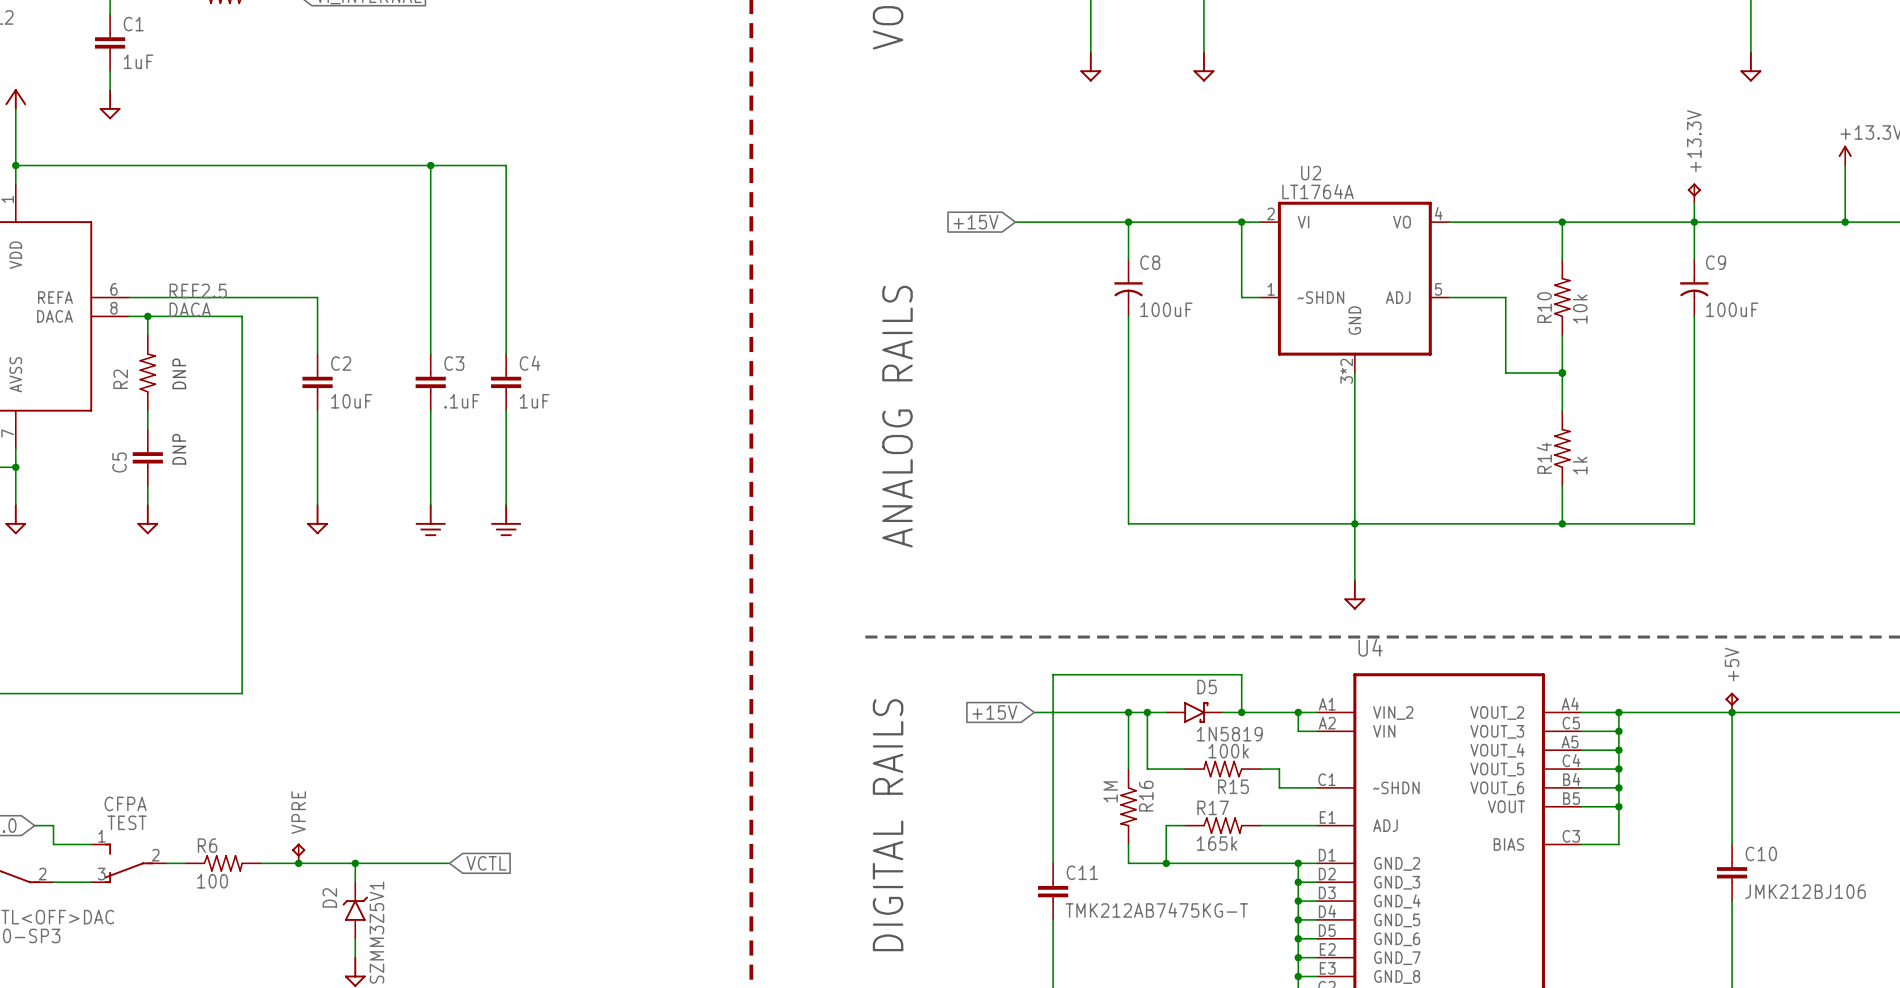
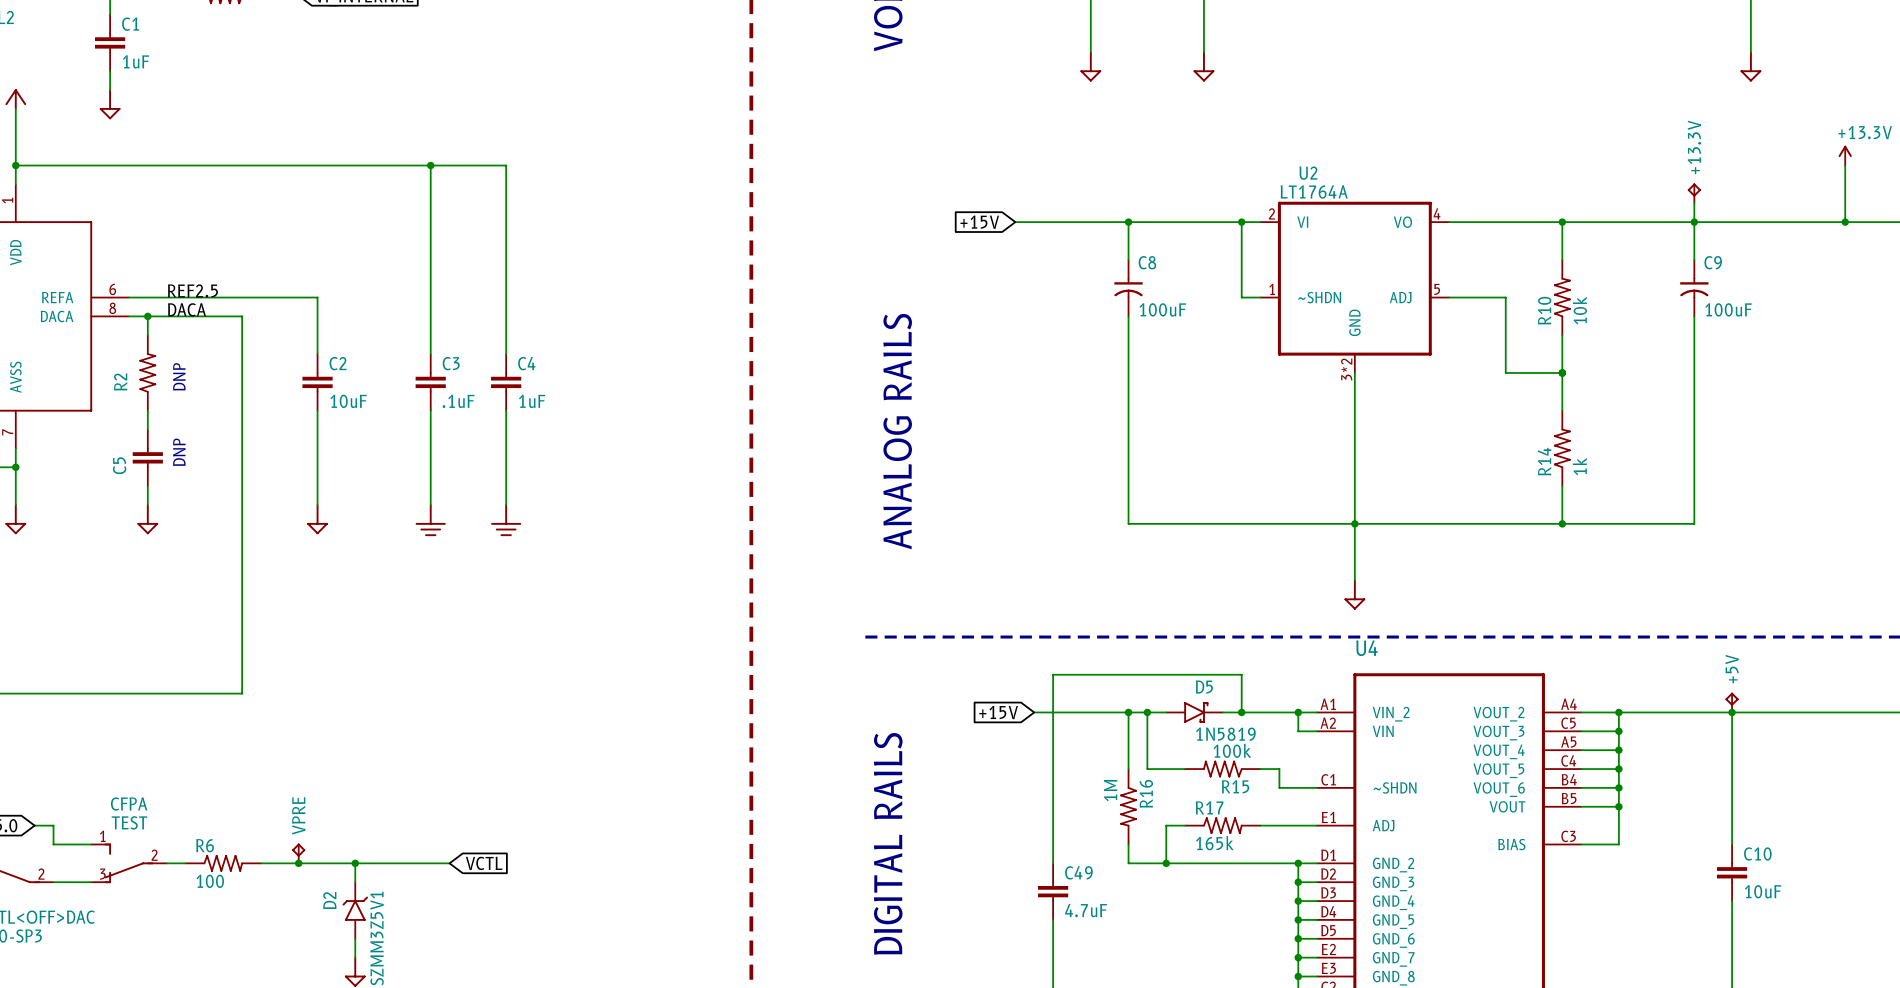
C11 name: C11 (1082, 872) -> C49 (1078, 872)
C10 value: JMK212BJ106 (1805, 891) -> 10uF (1763, 891)
C11 value: TMK212AB7475KG-T (1156, 910) -> 4.7uF (1086, 910)

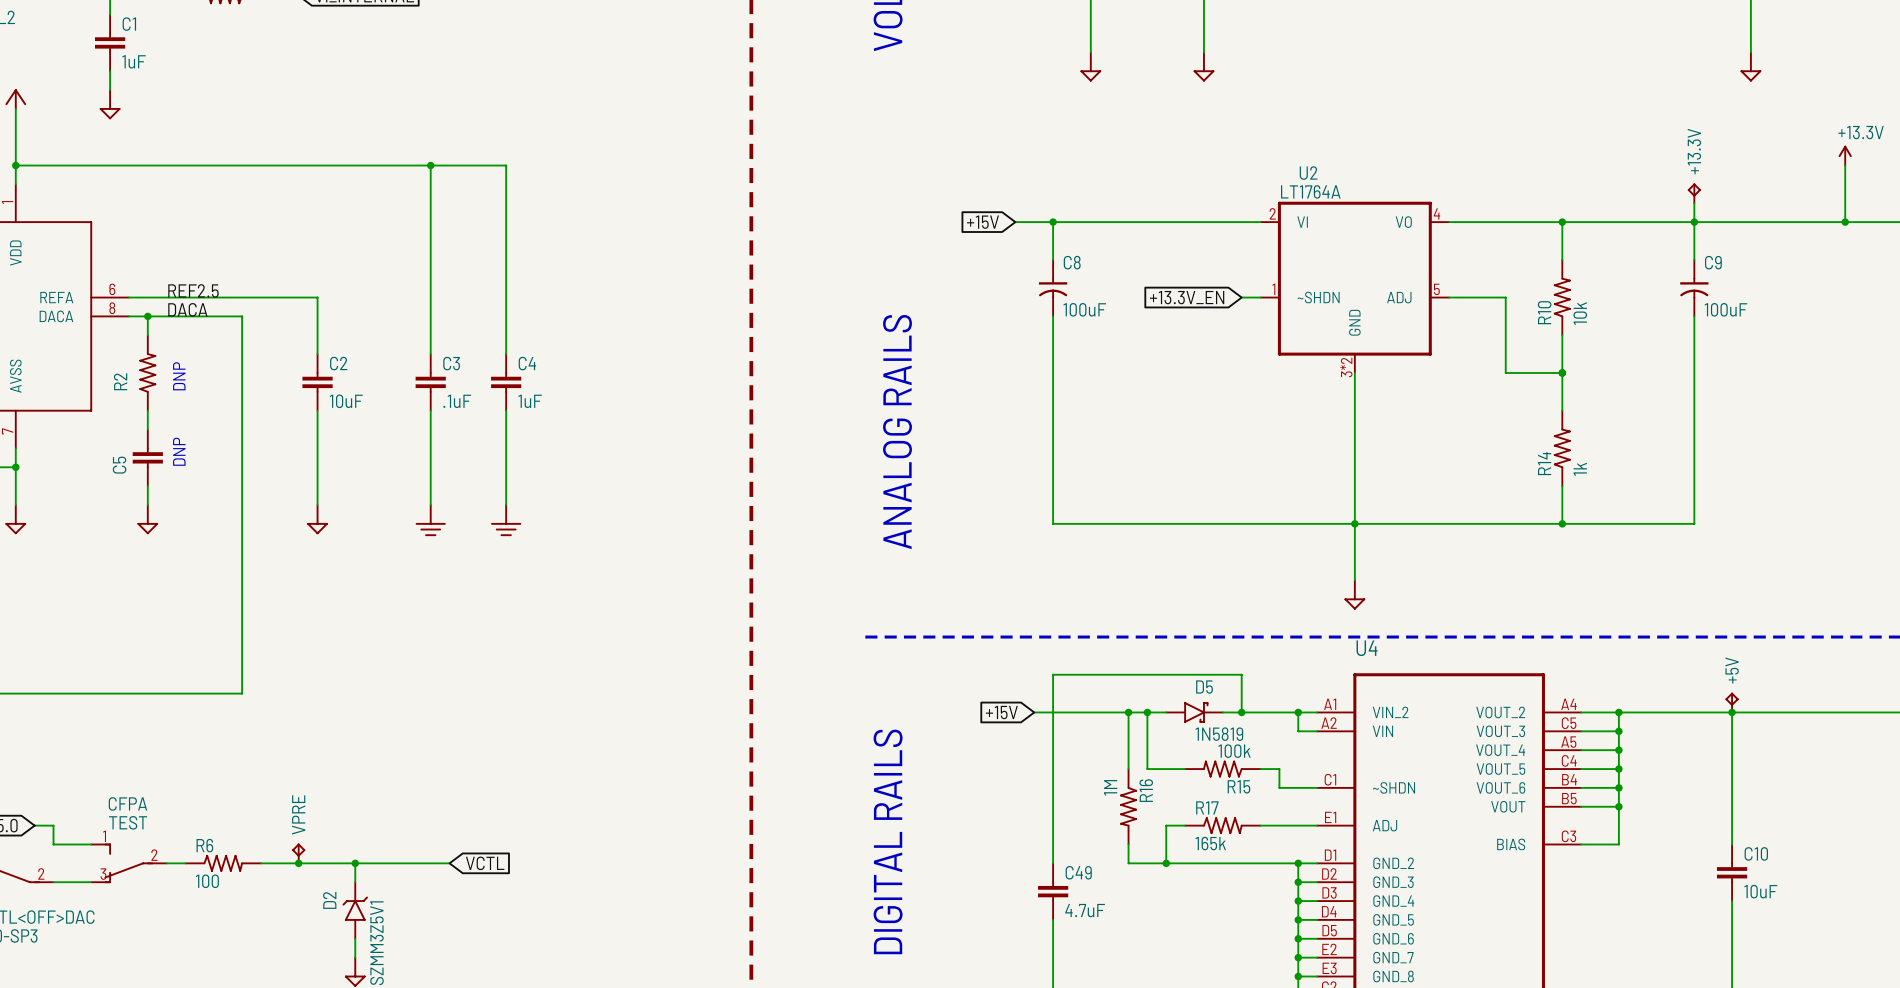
junction: none -> (1053, 222)
wire: (1128, 222) (1128, 259) -> (1053, 222) (1053, 259)
junction: (1128, 222) -> none
wire: (1241, 222) (1241, 297) -> none
junction: (1241, 222) -> none
C8 position: (1128, 288) -> (1053, 288)
global label: none -> +13.3V_EN (1187, 297)
wire: (1128, 316) (1128, 523) -> (1053, 316) (1053, 523) (1128, 523)

